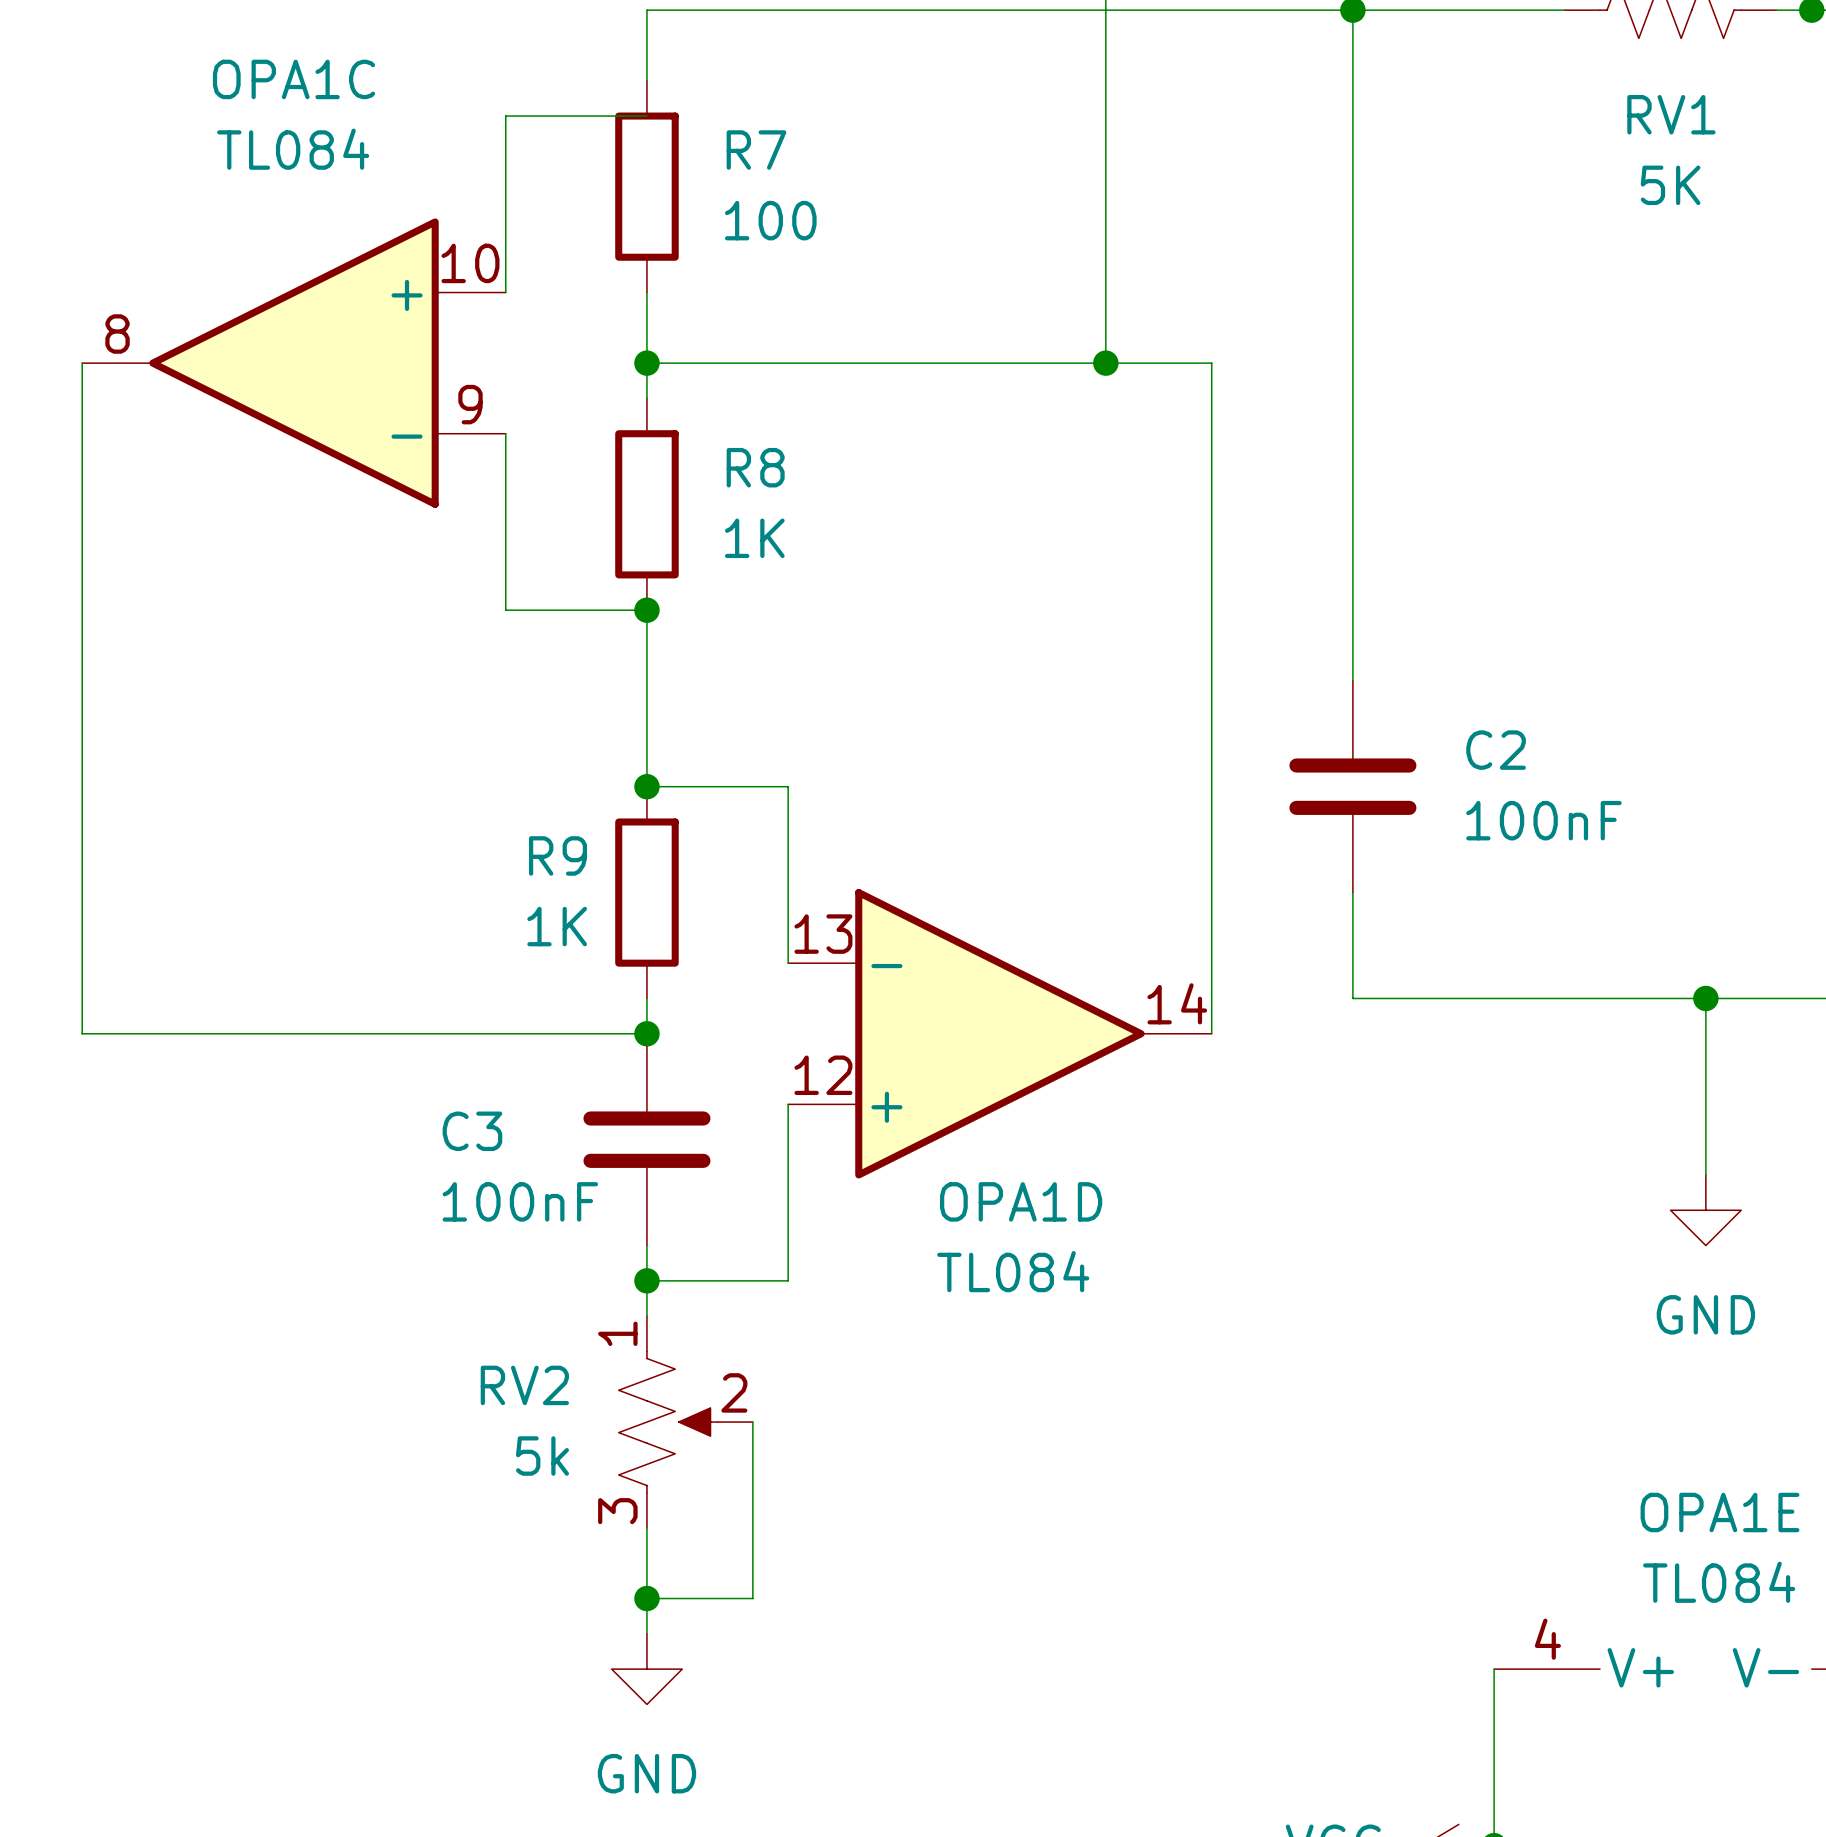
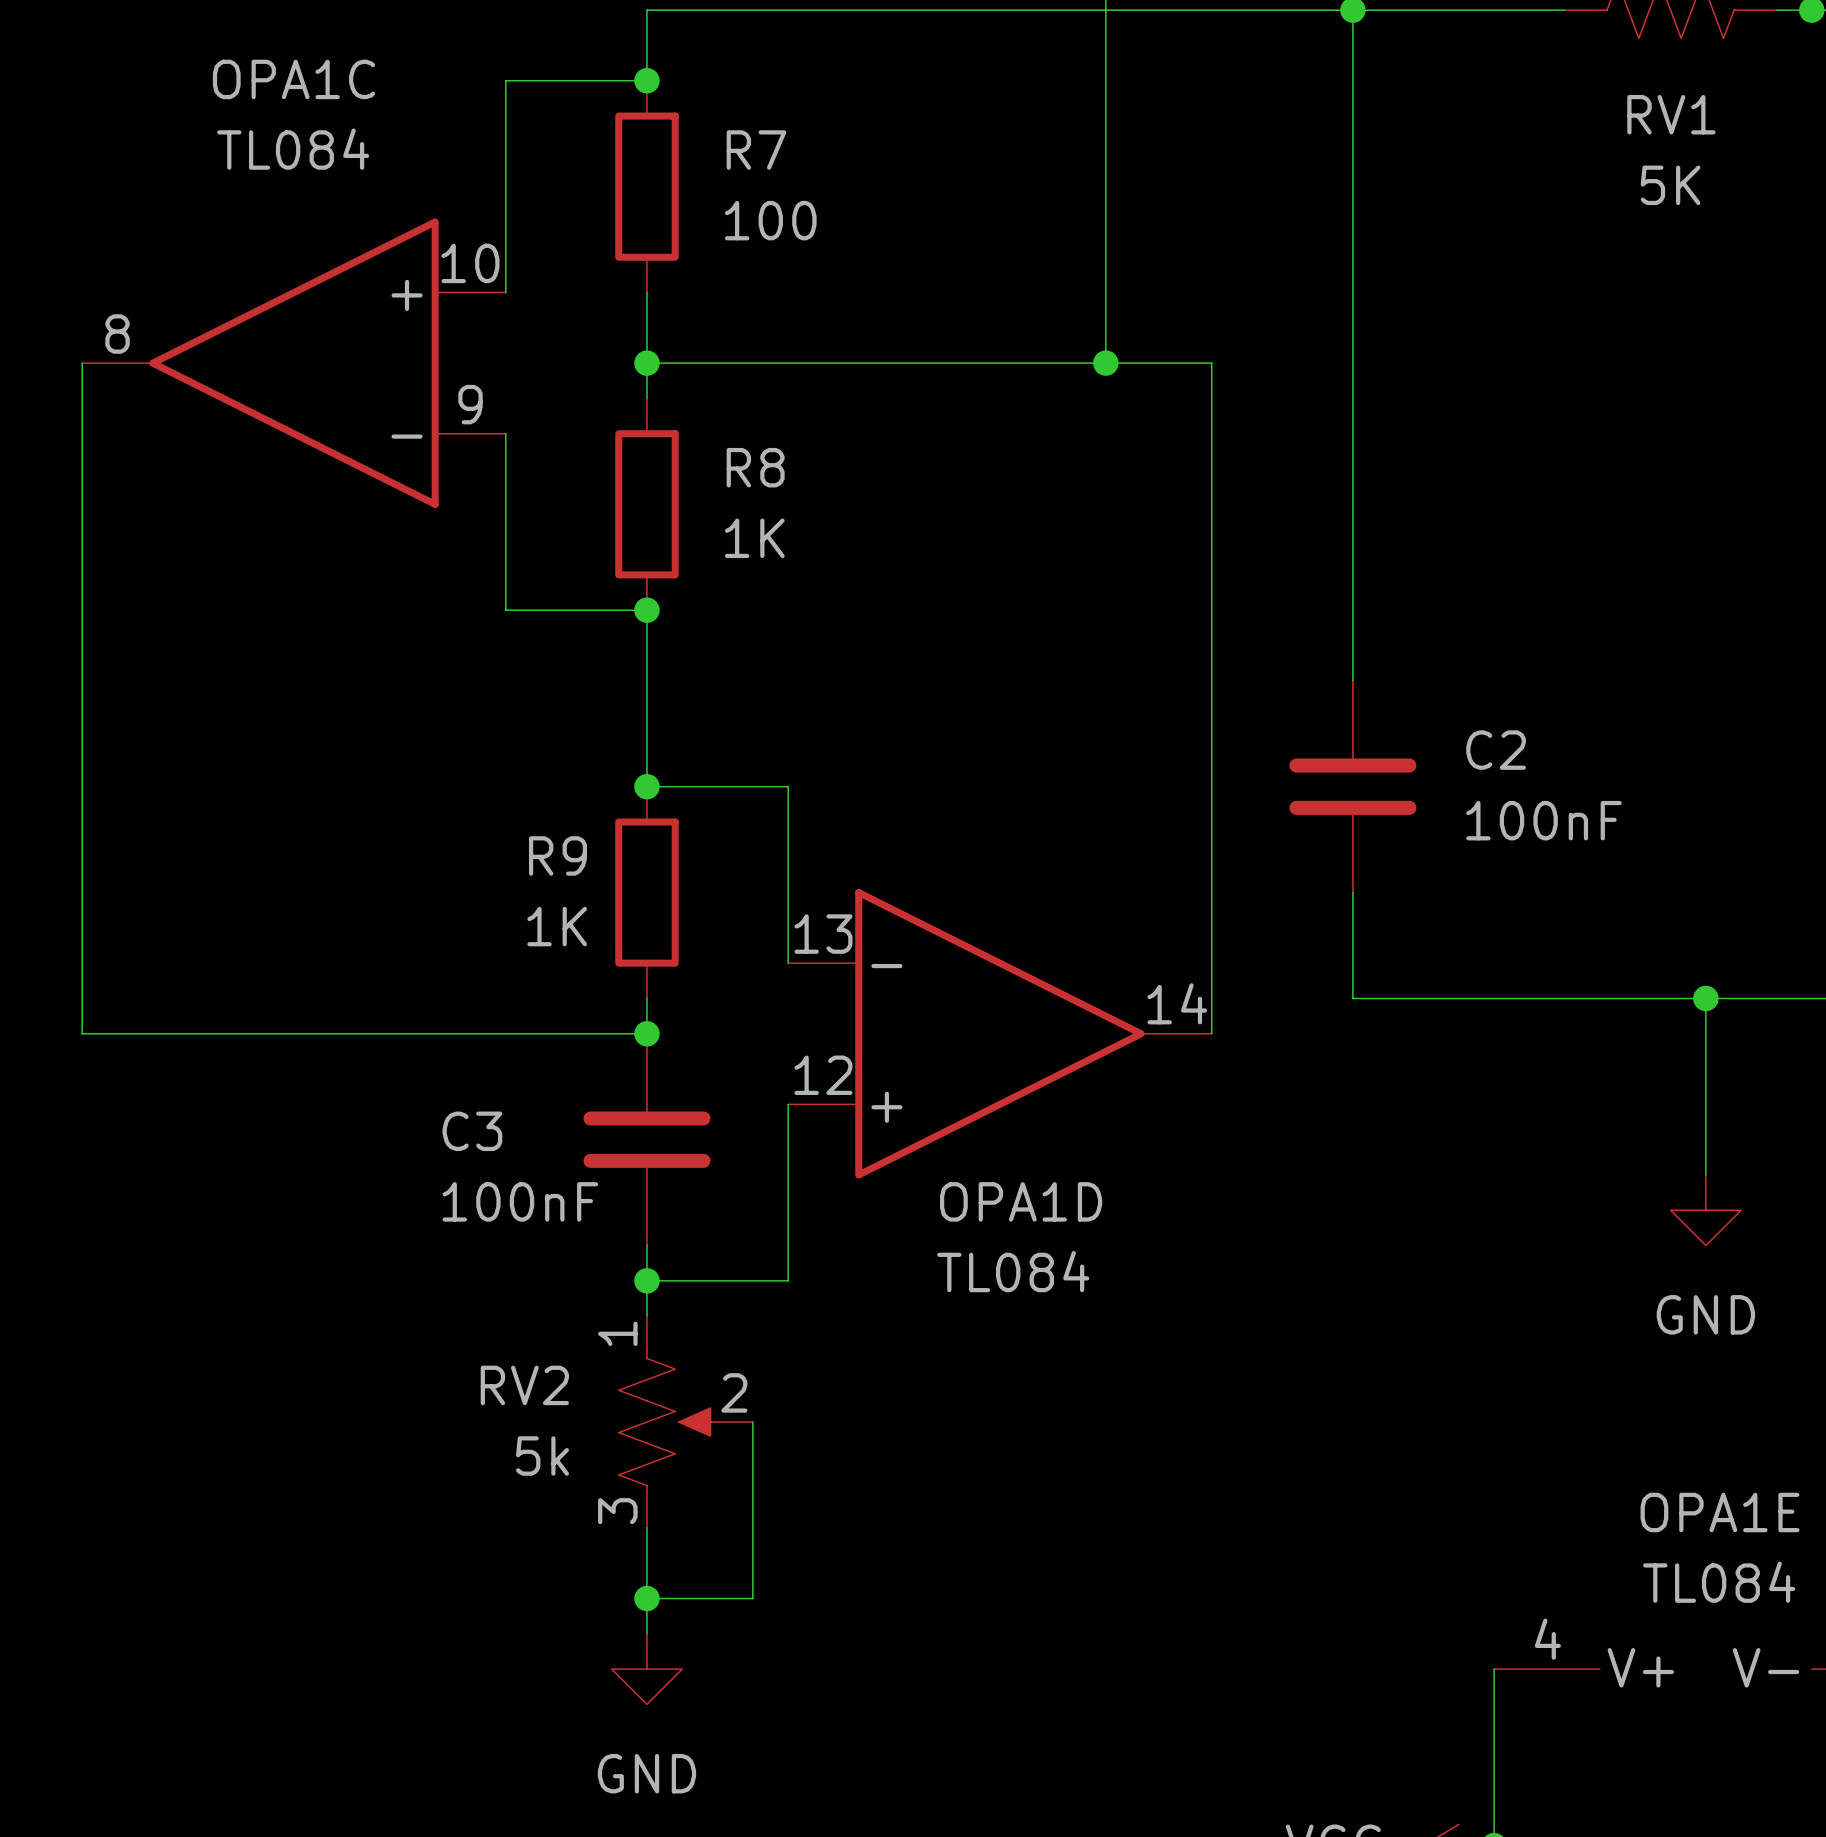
junction: none -> (646, 80)
wire: (505, 116) (646, 116) -> (505, 116) (505, 80) (646, 80)

